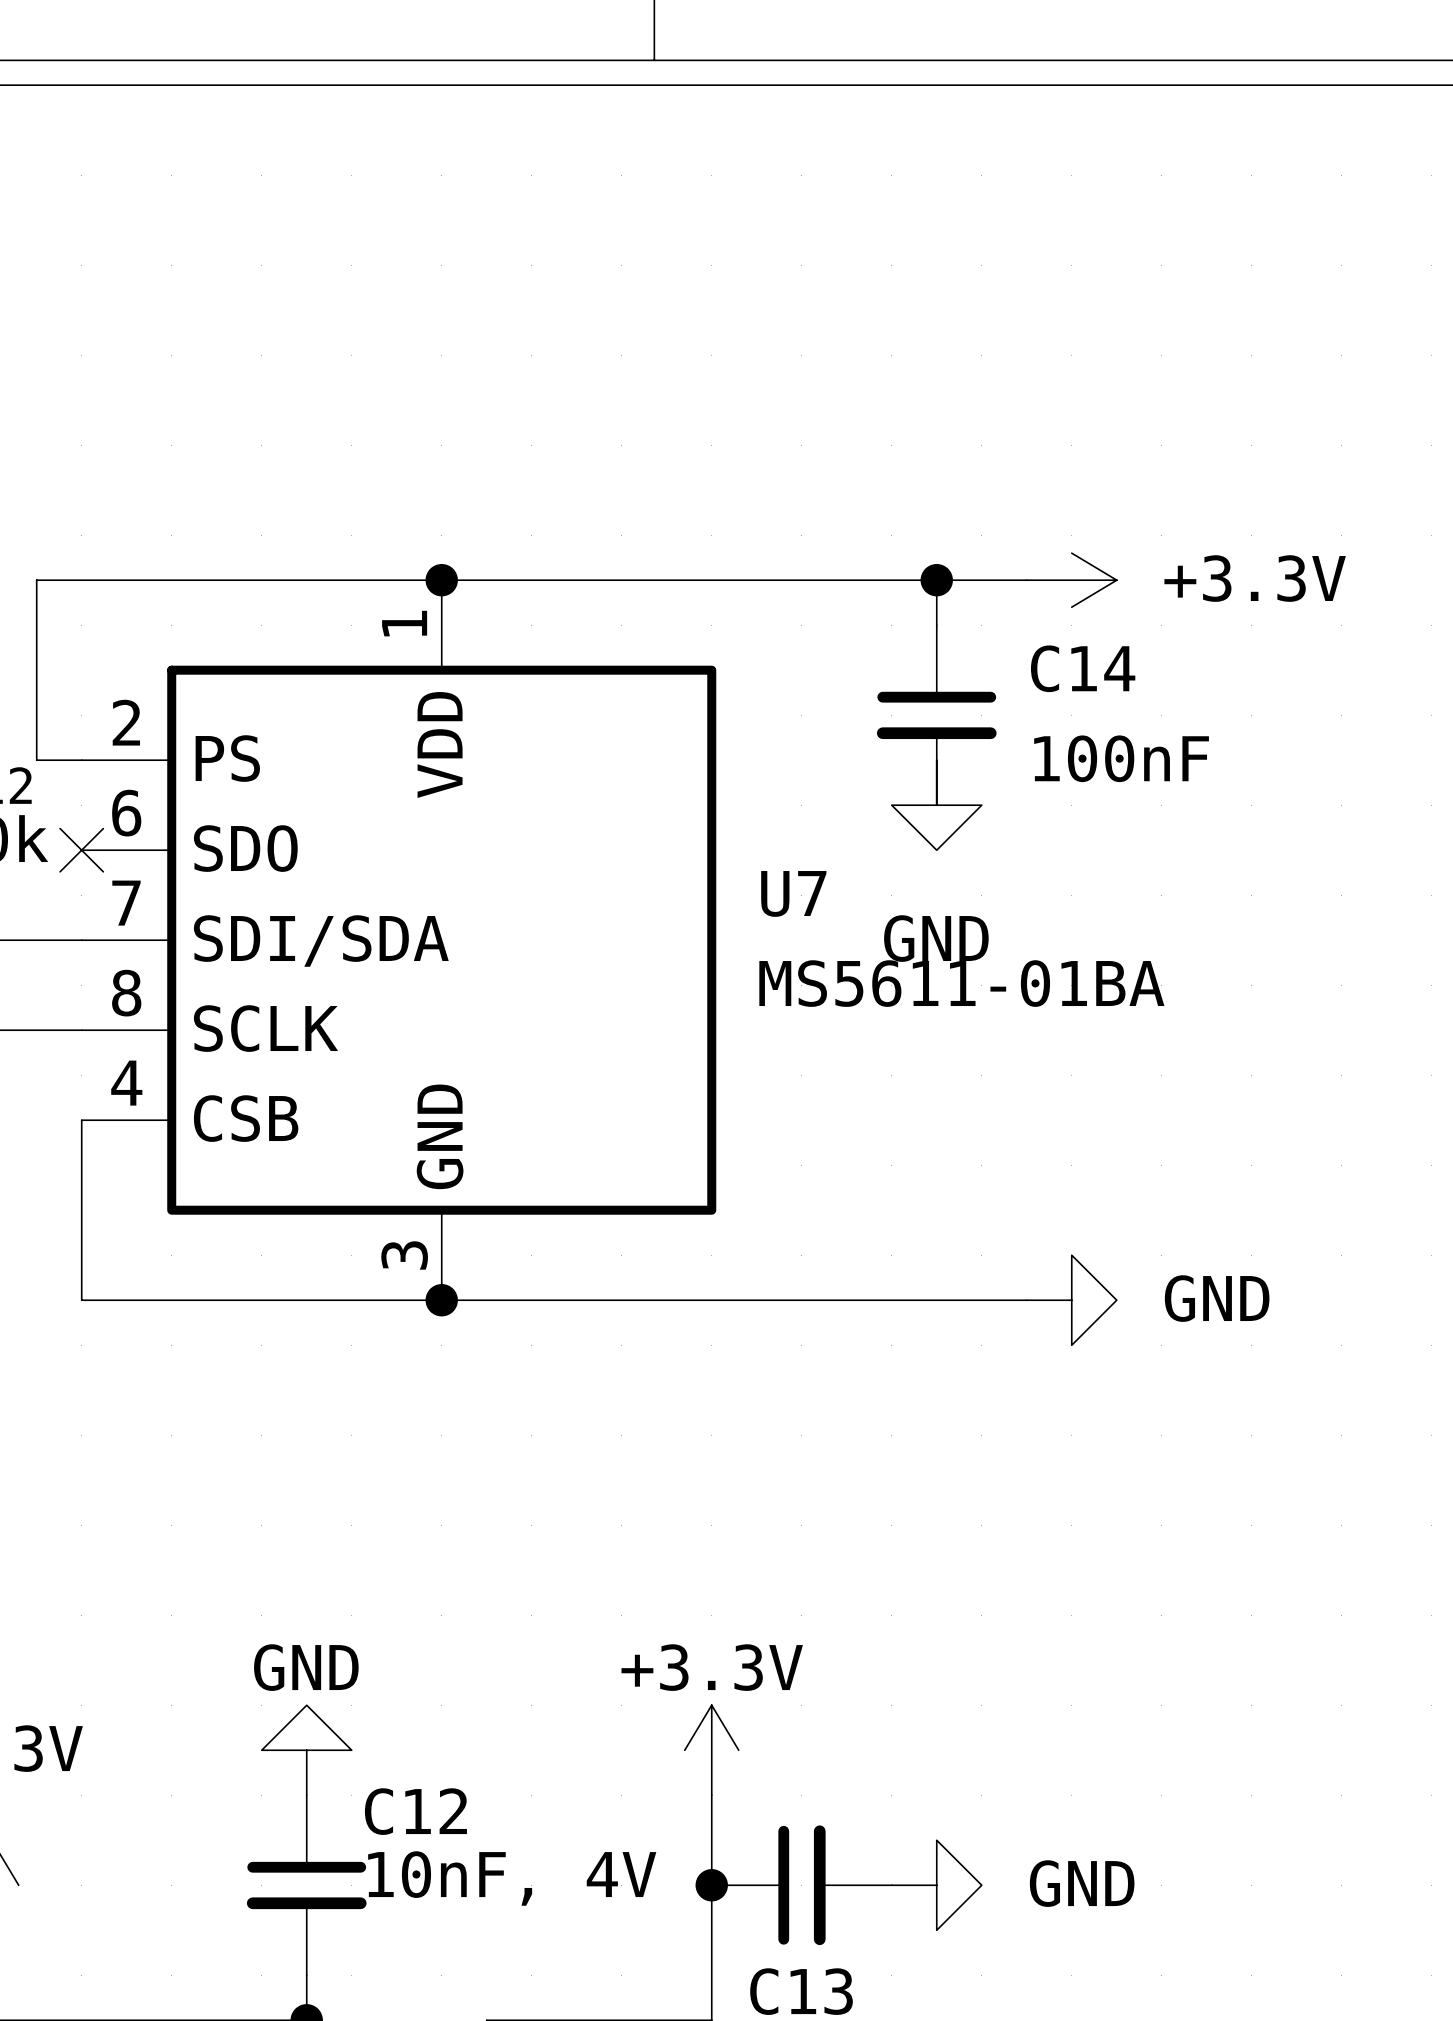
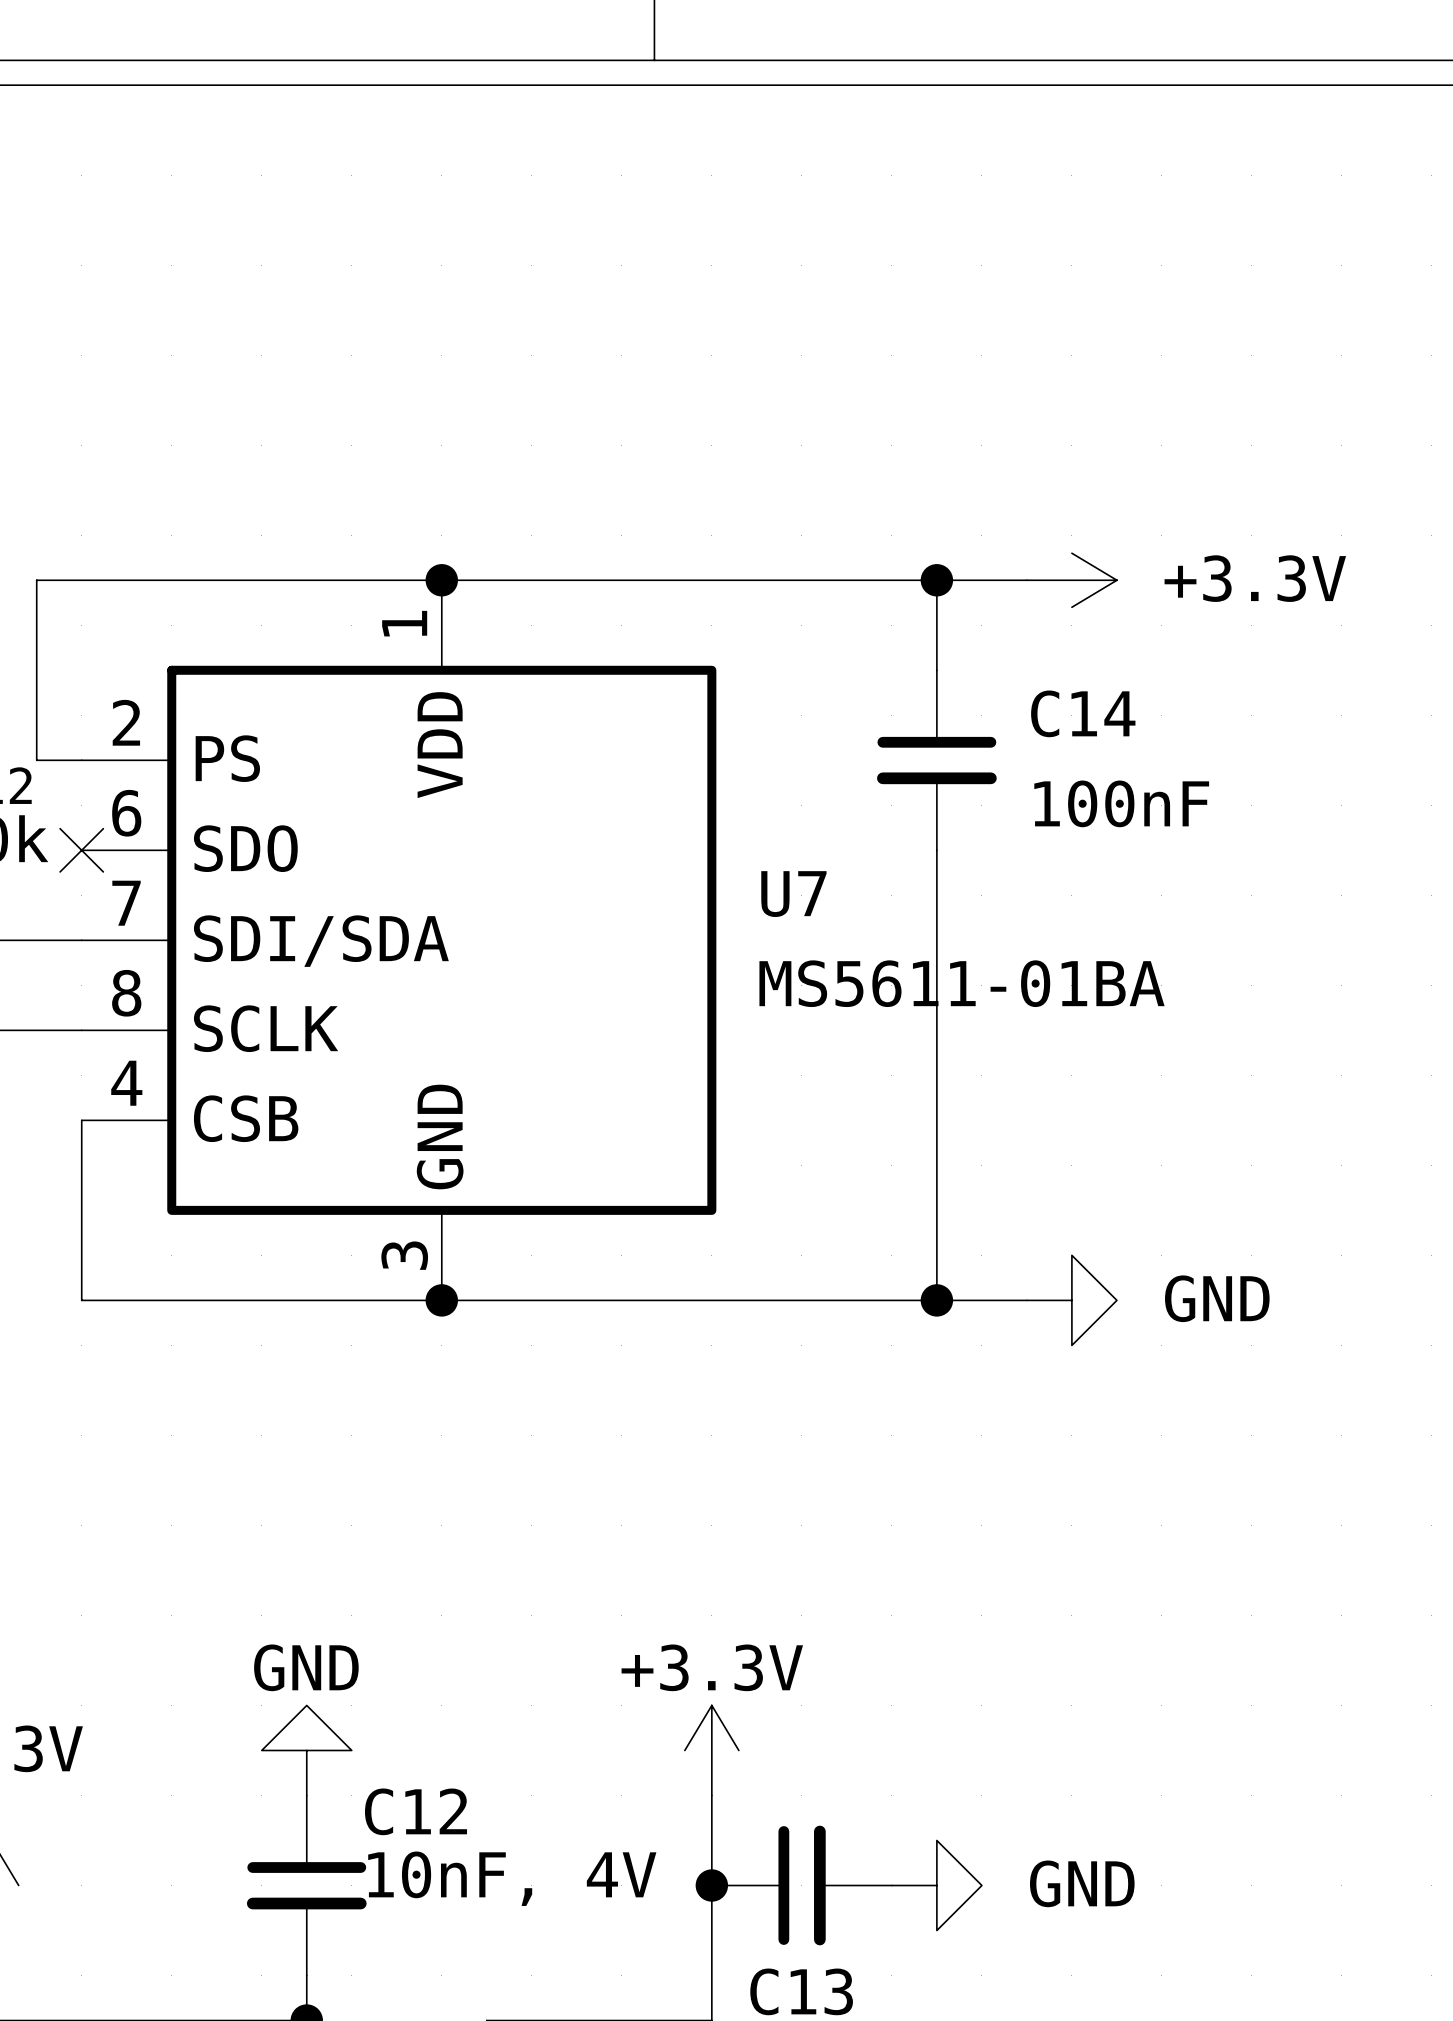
C14 position: (936, 715) -> (936, 760)
power symbol: GND (936, 805) -> none
wire: none -> (936, 850) (936, 1300)
junction: none -> (936, 1300)

